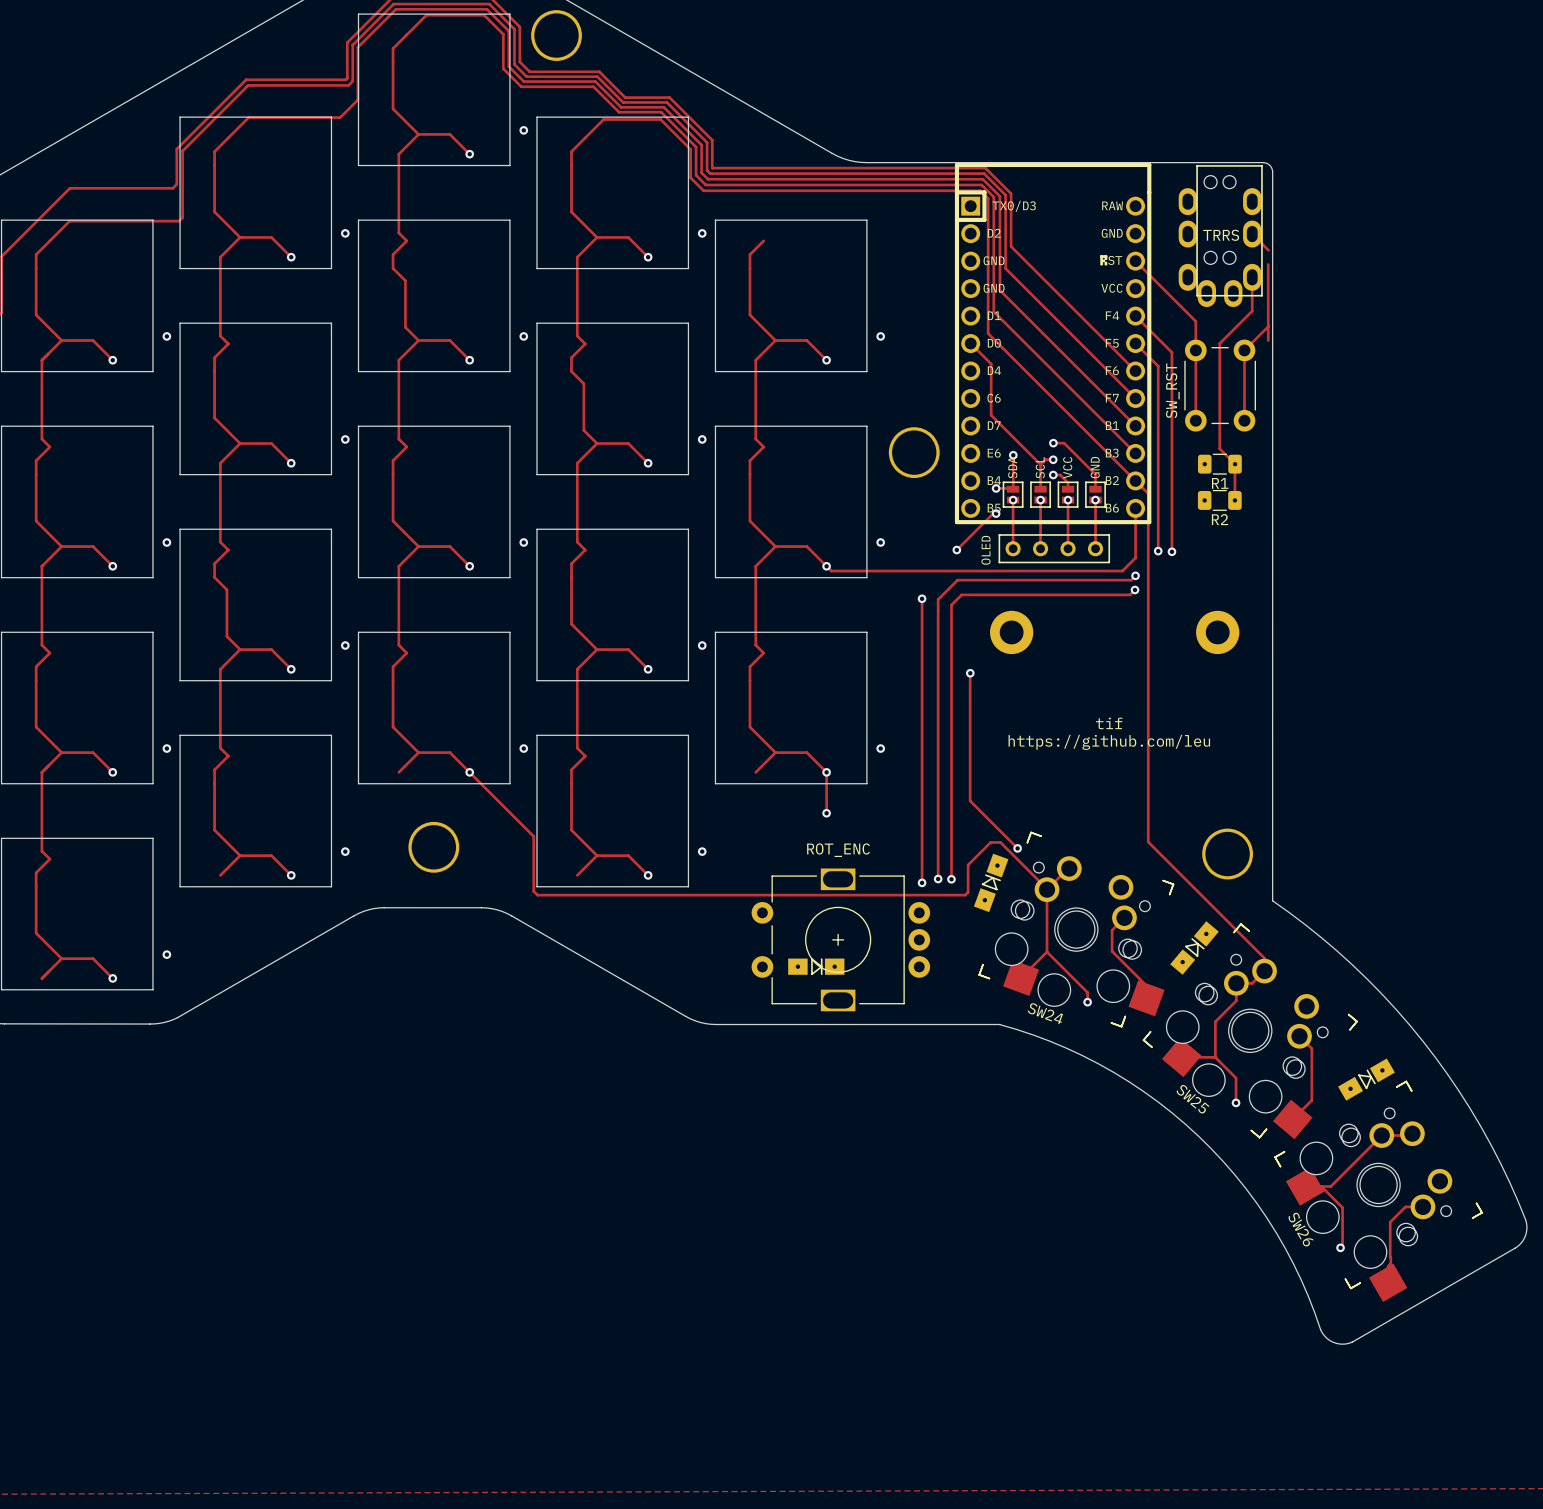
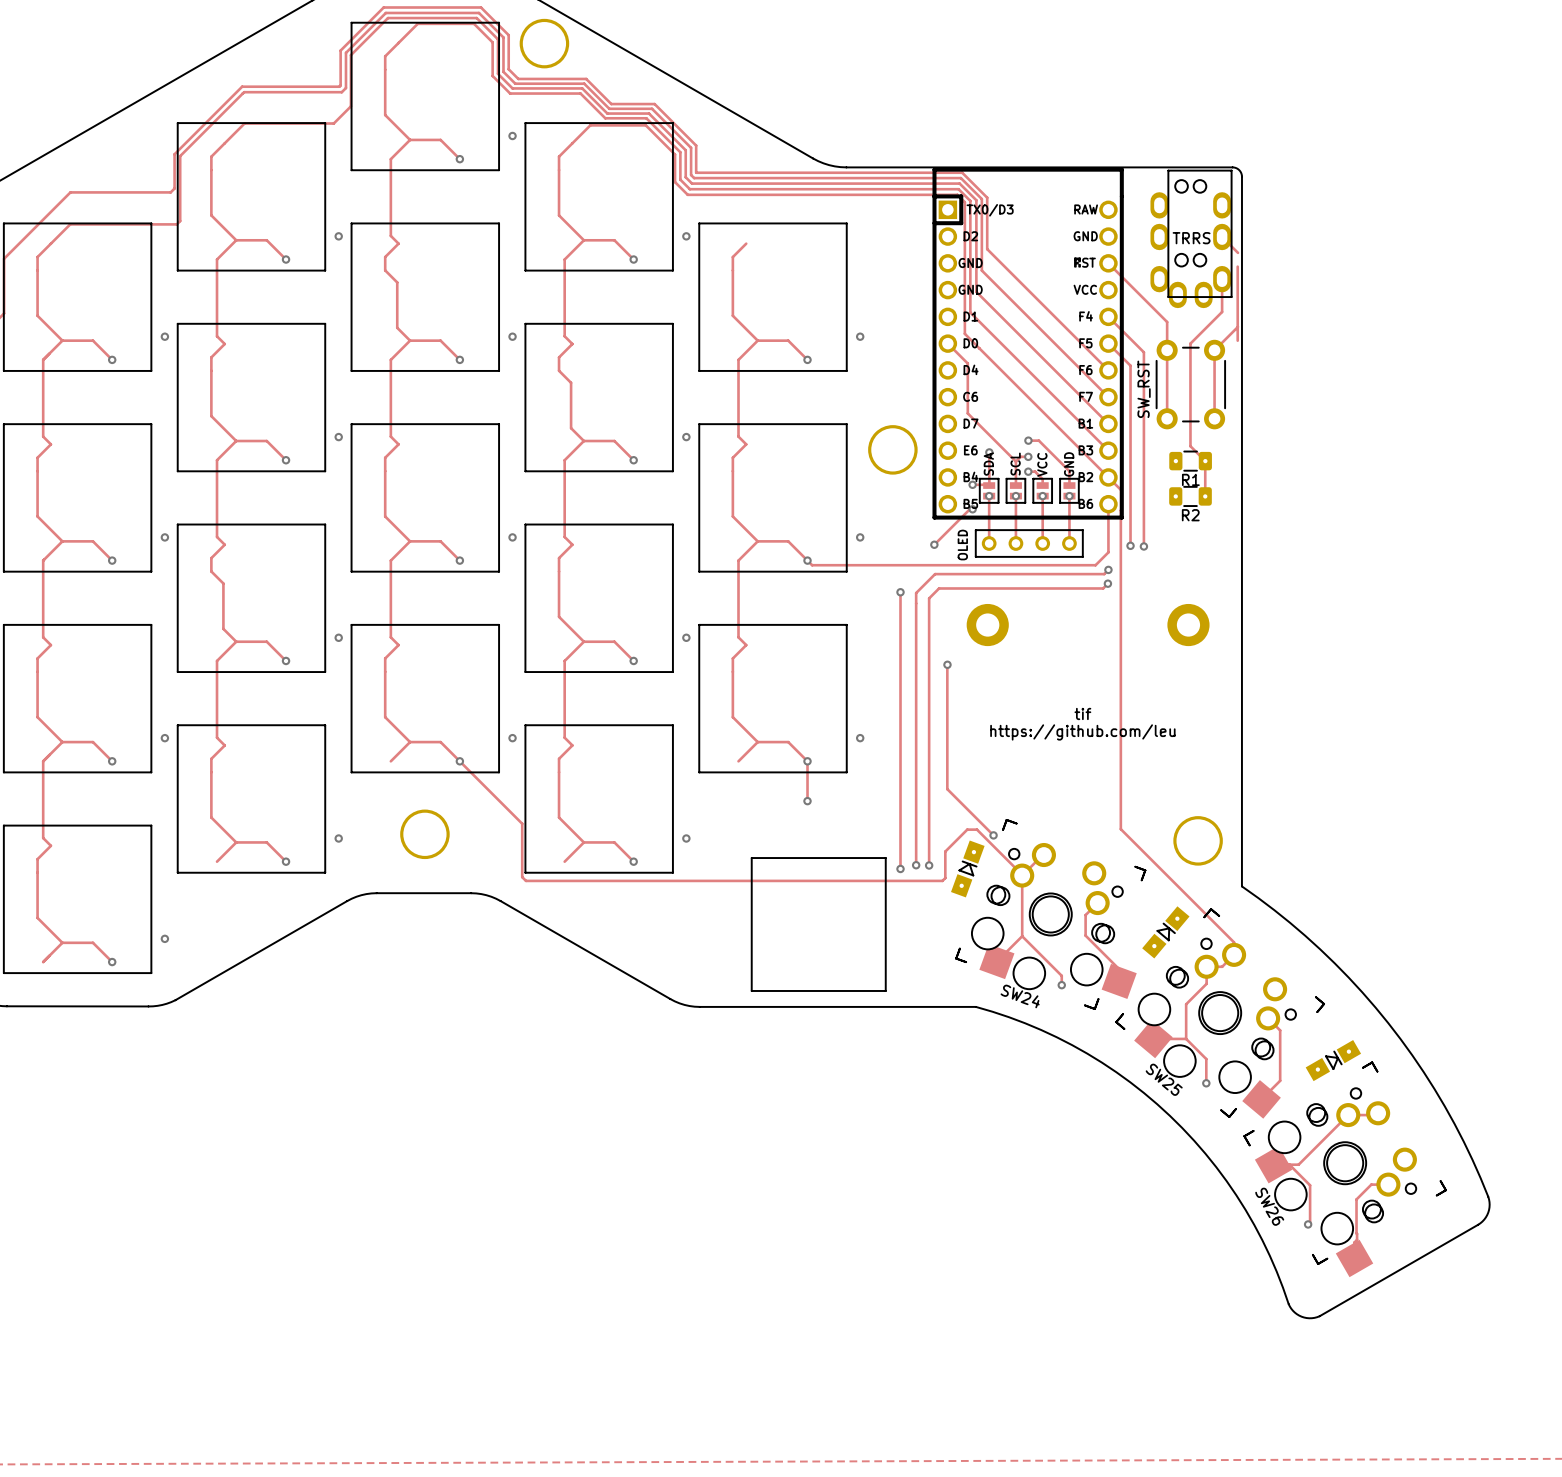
board edge: none -> (751, 858) (751, 990) (885, 990) (885, 858) (751, 858)
ROT_ENC: (840, 939) -> none
part: (816, 966) -> none

